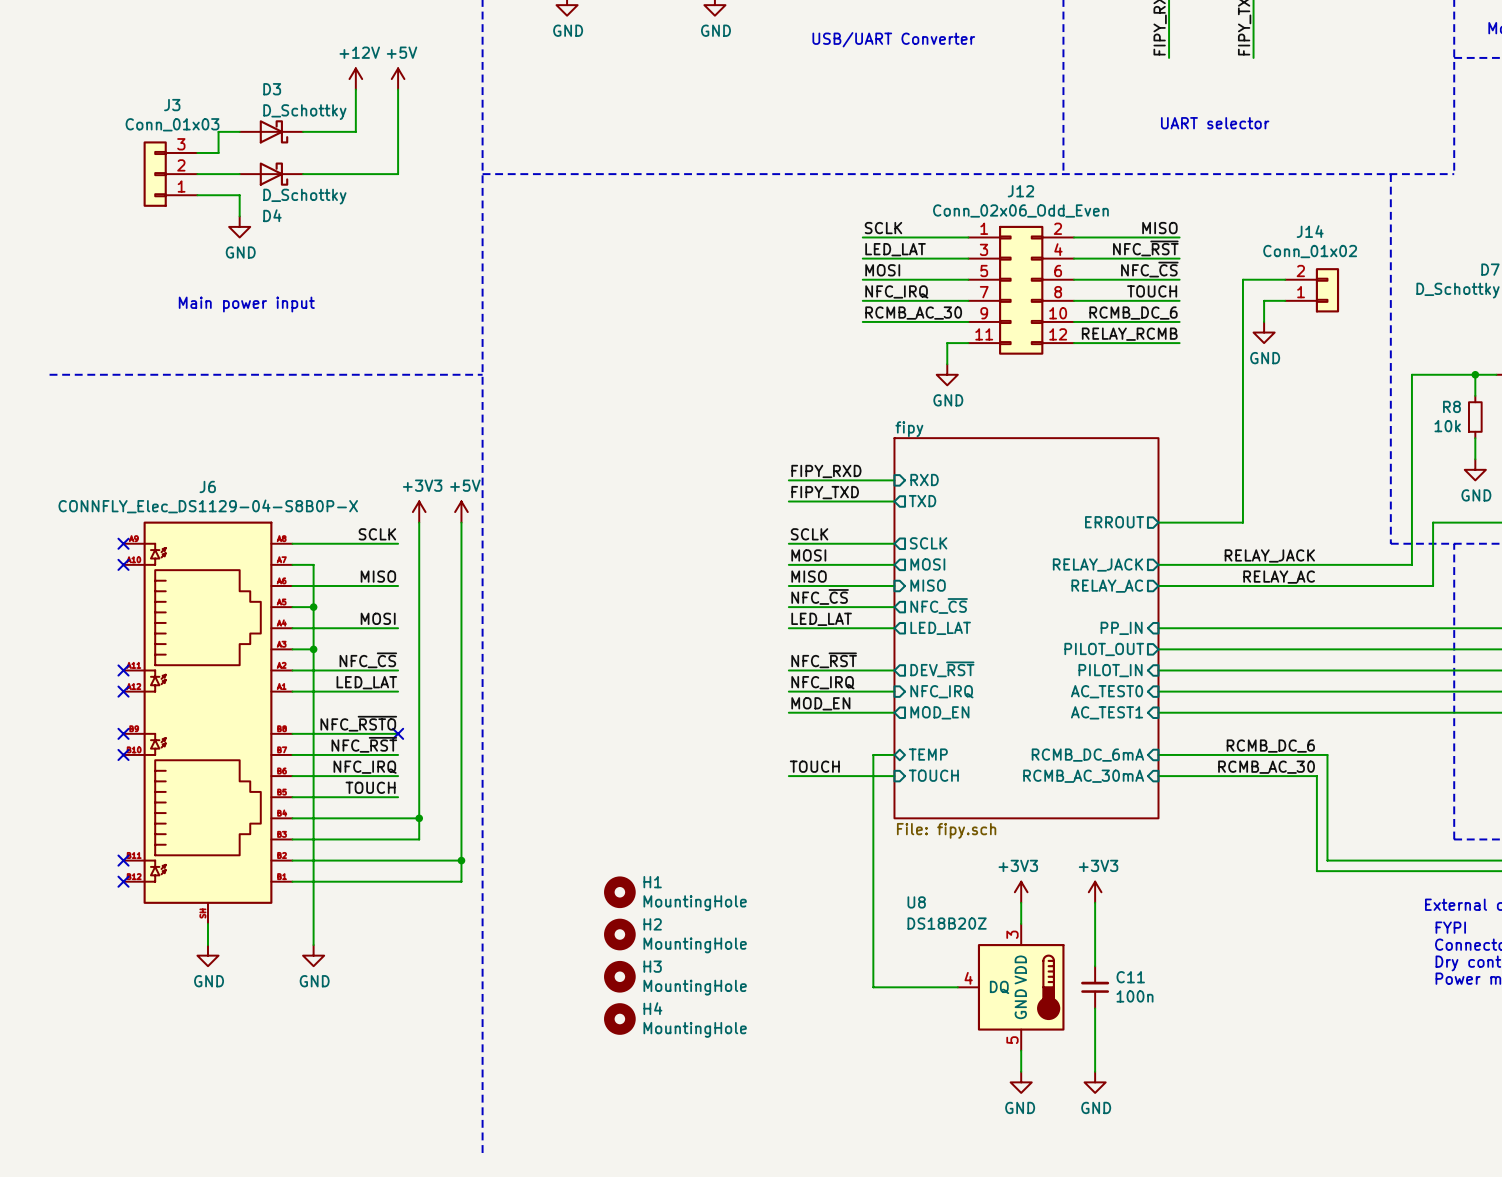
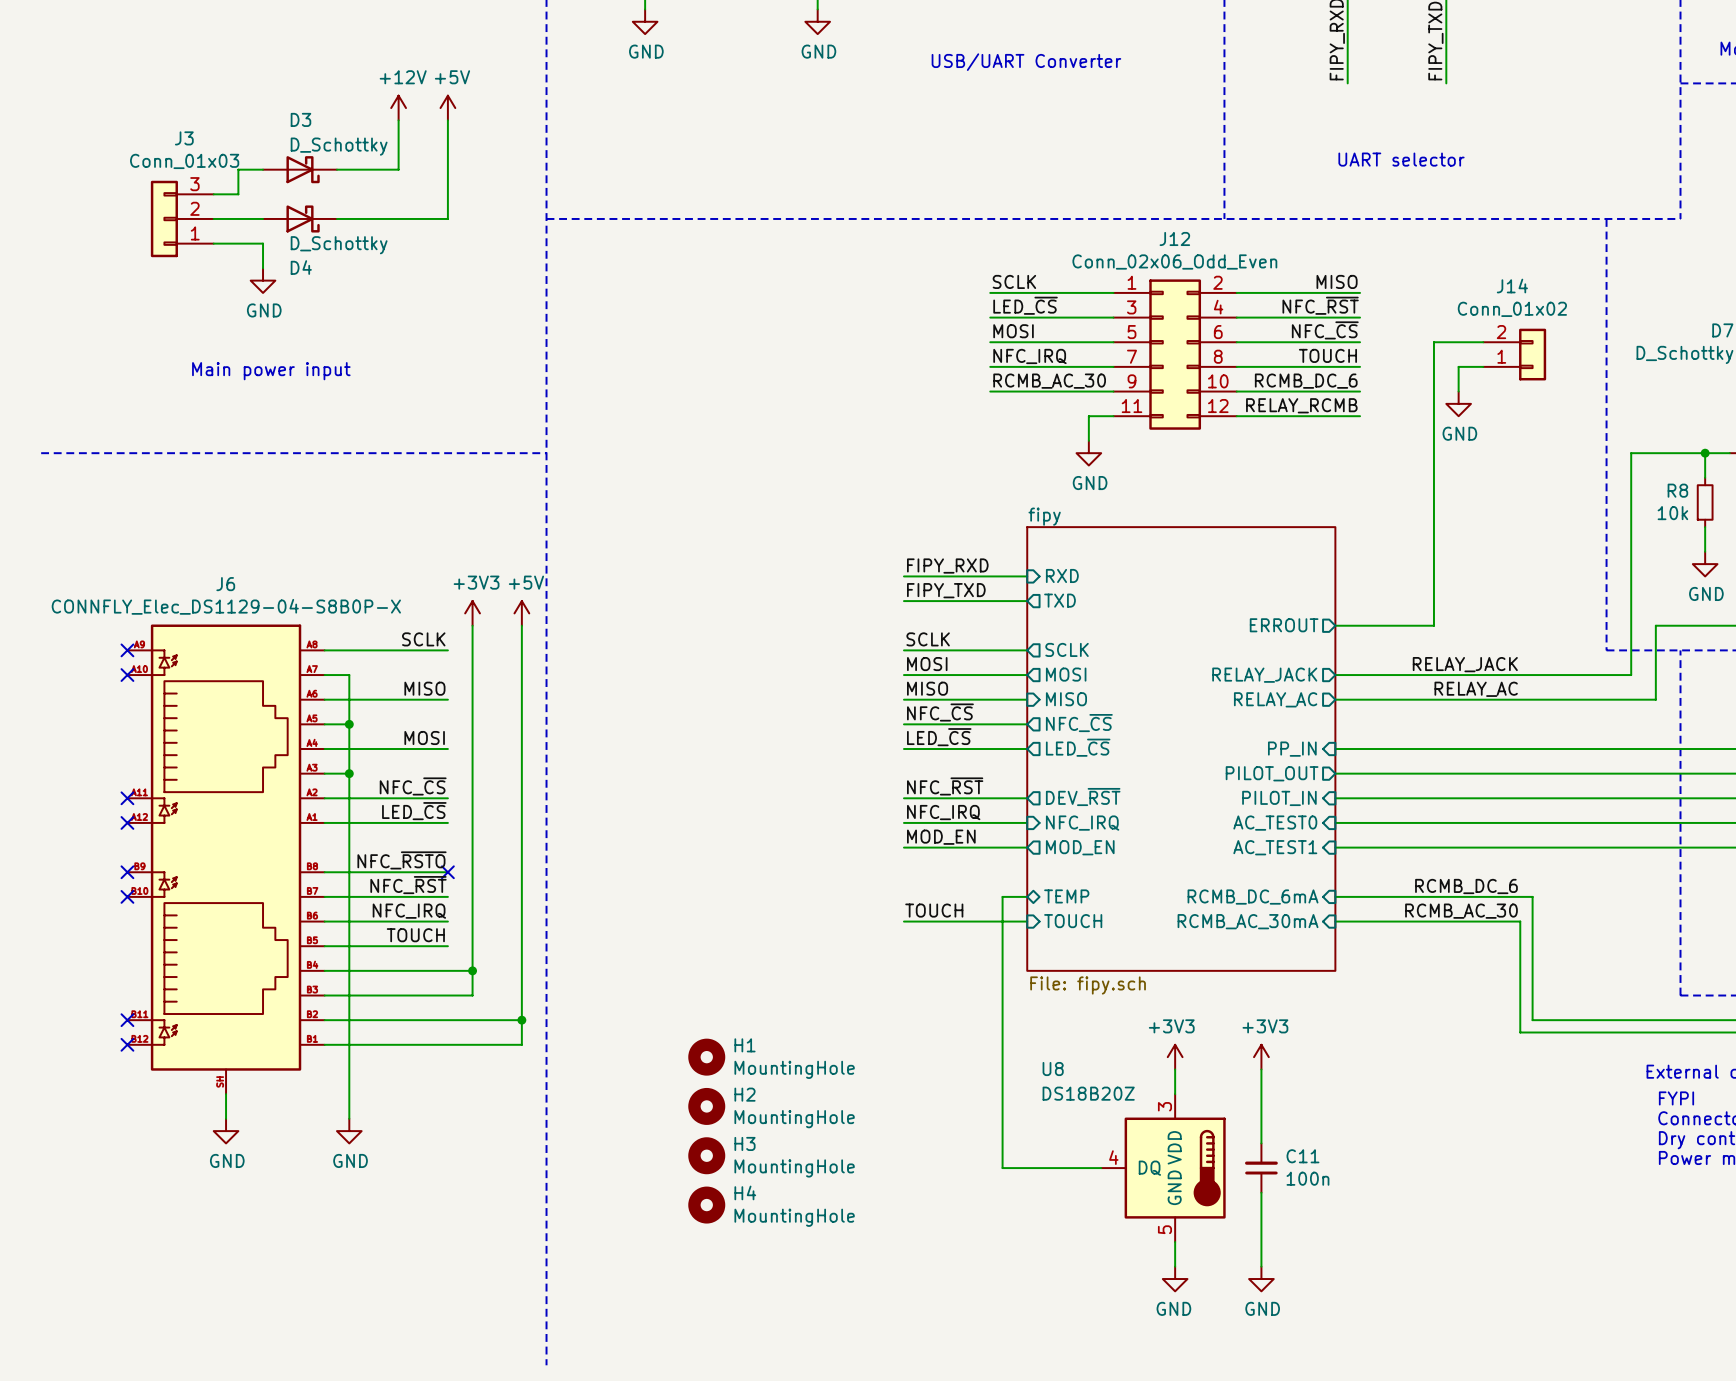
label: LED_LAT (895, 249) -> LED_~{CS} (1025, 305)
label: LED_LAT (821, 619) -> LED_~{CS} (939, 737)
sheet pin: LED_LAT (940, 628) -> LED_~{CS} (1078, 747)
label: LED_LAT (366, 682) -> LED_~{CS} (414, 811)

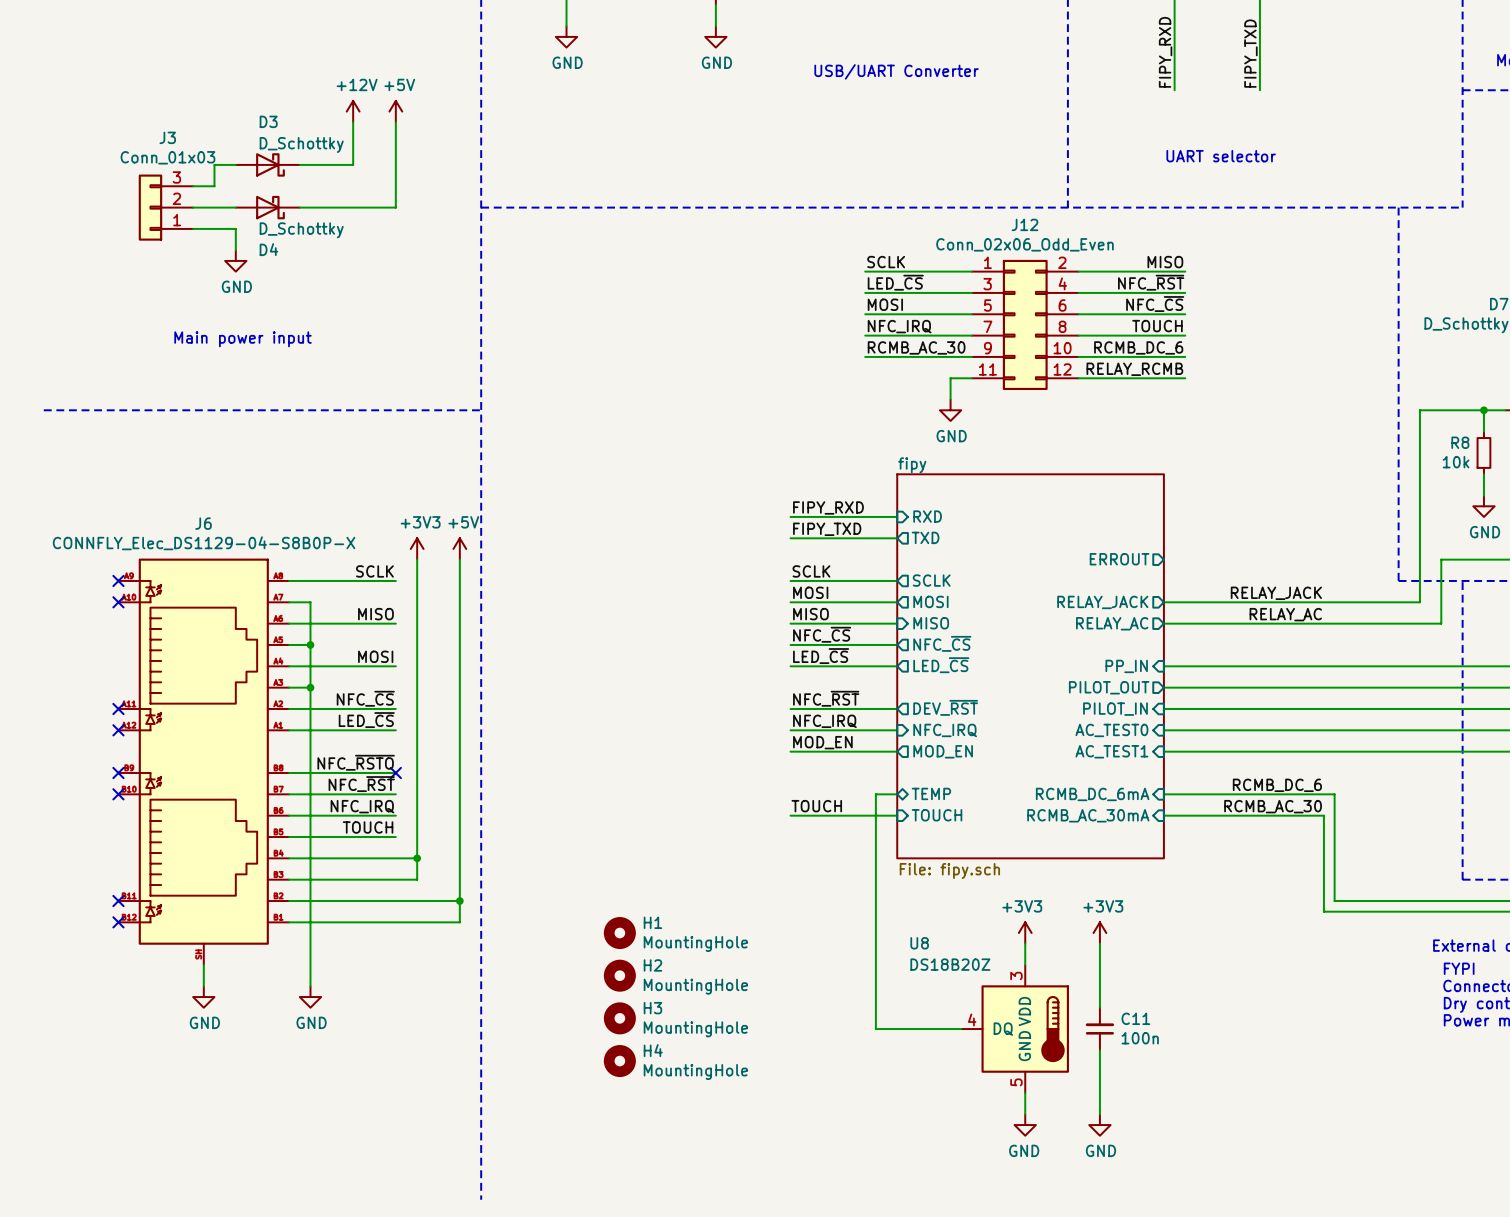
wire: (1483, 342) (1433, 342) (1433, 625) (1335, 625) -> none
J14: Conn_01x02 (1514, 354) -> none
wire: (1483, 366) (1458, 366) (1458, 391) -> none
power symbol: GND (1458, 403) -> none

